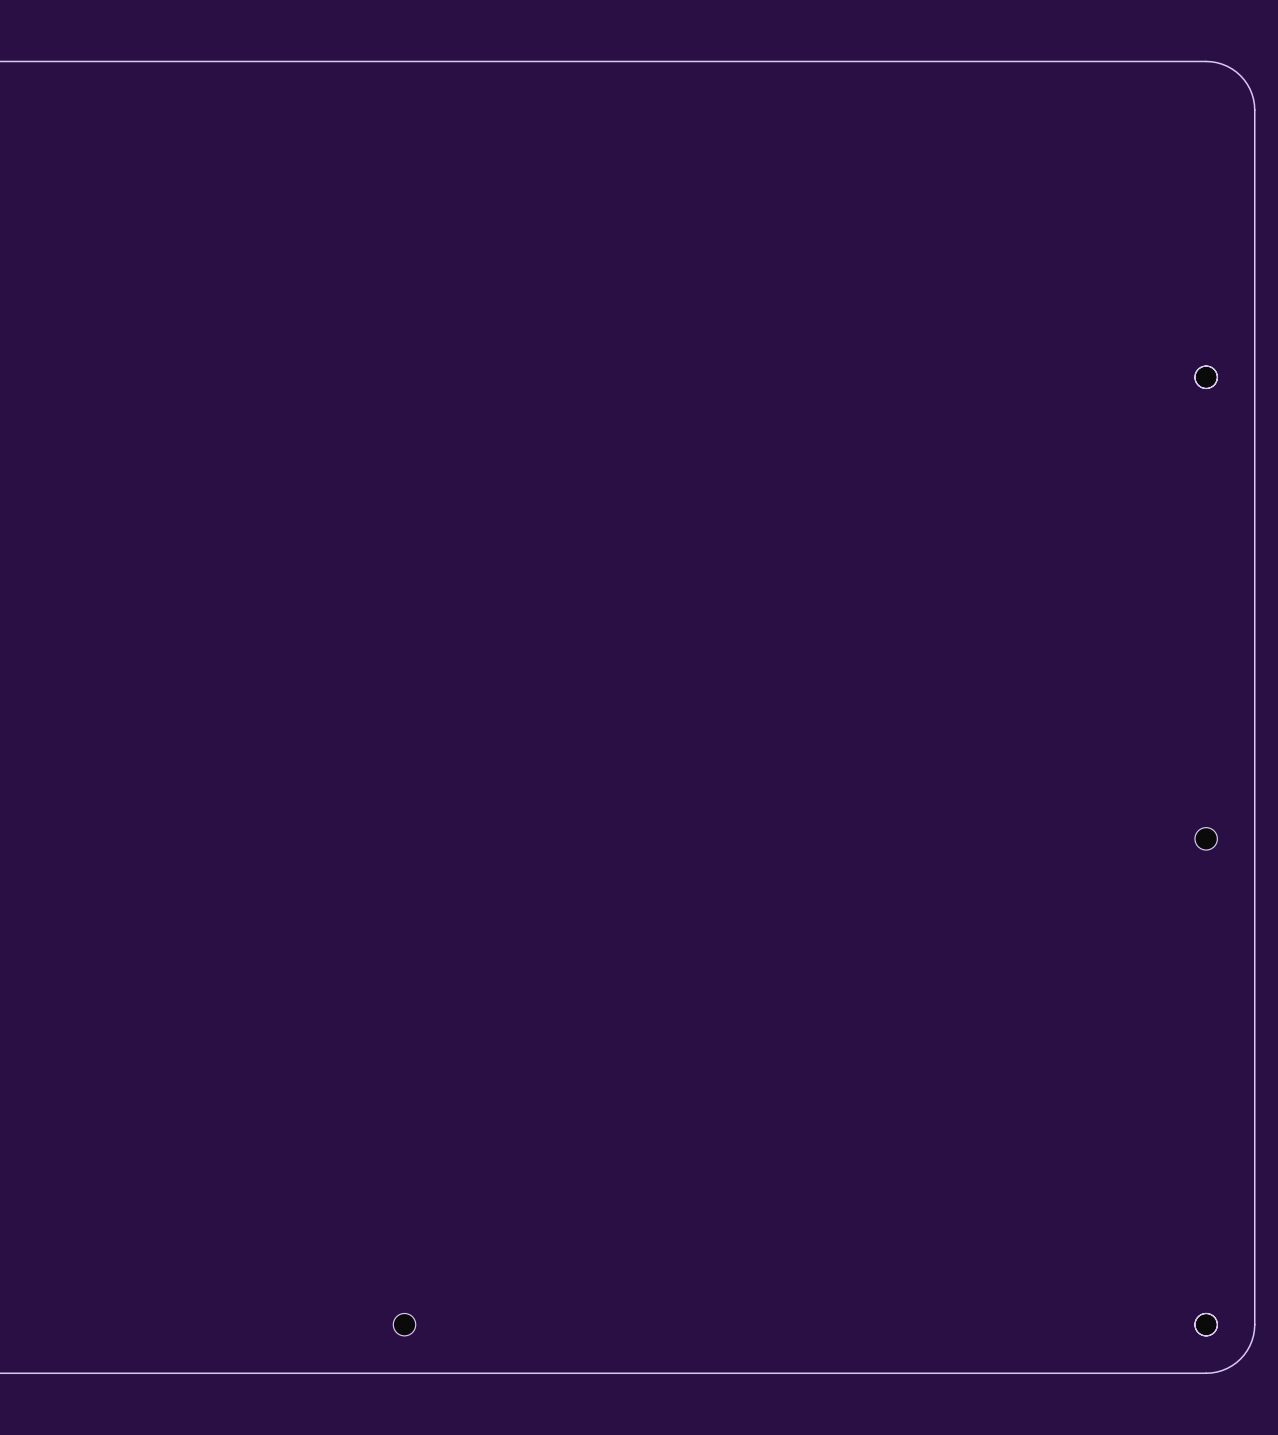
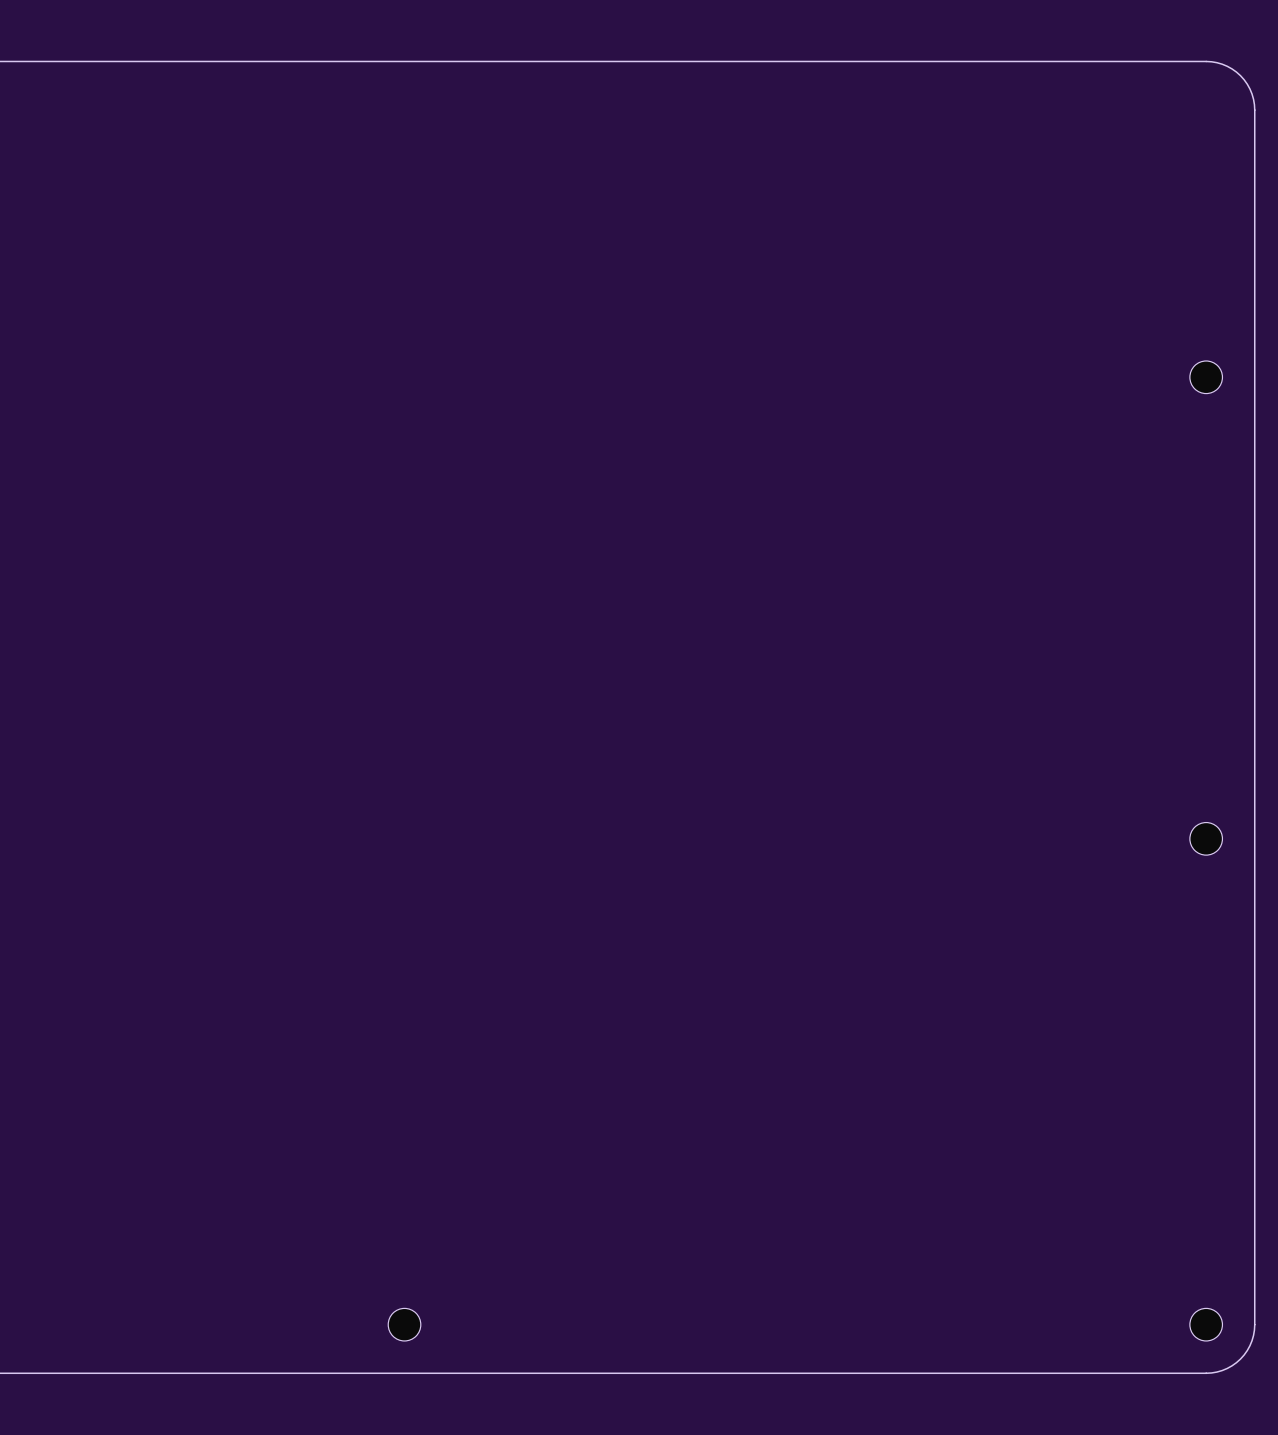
part footprint: [1194, 366, 1218, 389] -> [1189, 361, 1223, 394]
part footprint: [1194, 827, 1218, 851] -> [1189, 822, 1223, 856]
part footprint: [393, 1313, 416, 1336] -> [388, 1308, 421, 1341]
part footprint: [1194, 1313, 1218, 1336] -> [1189, 1308, 1223, 1341]

